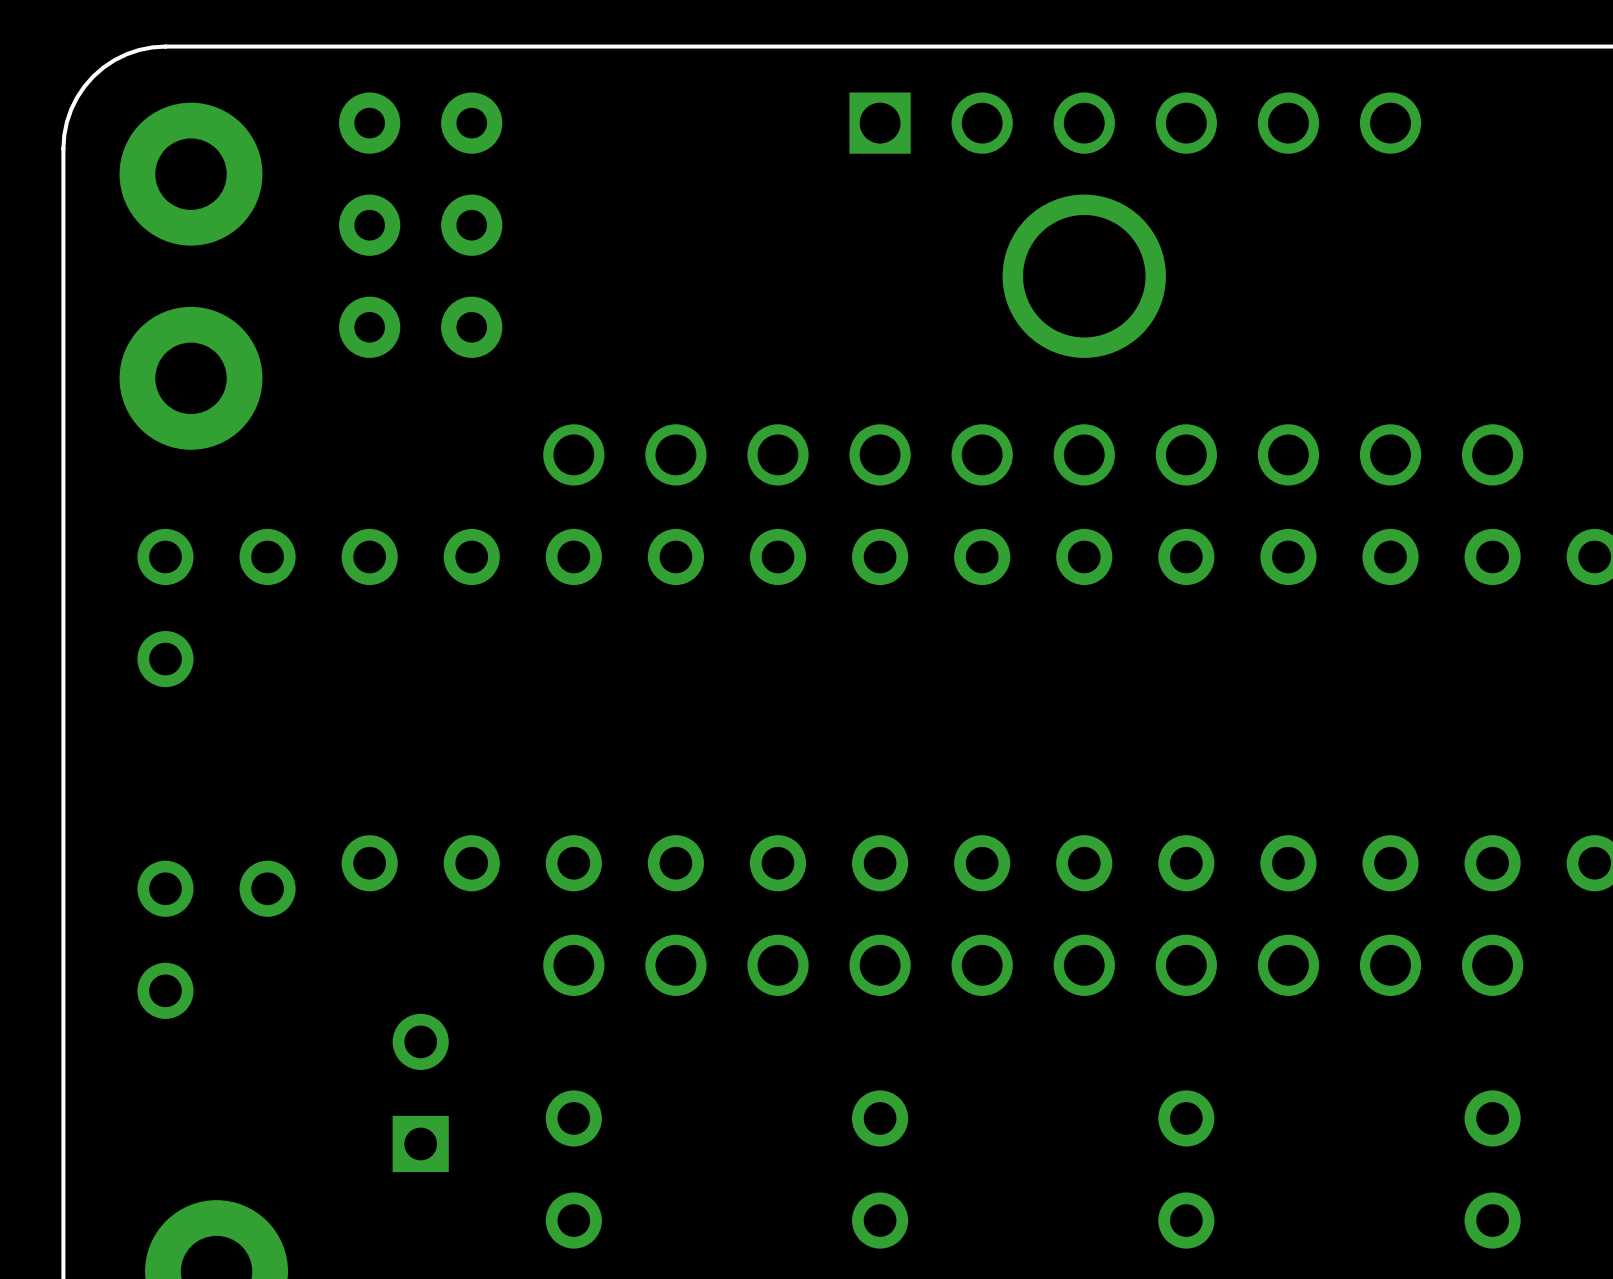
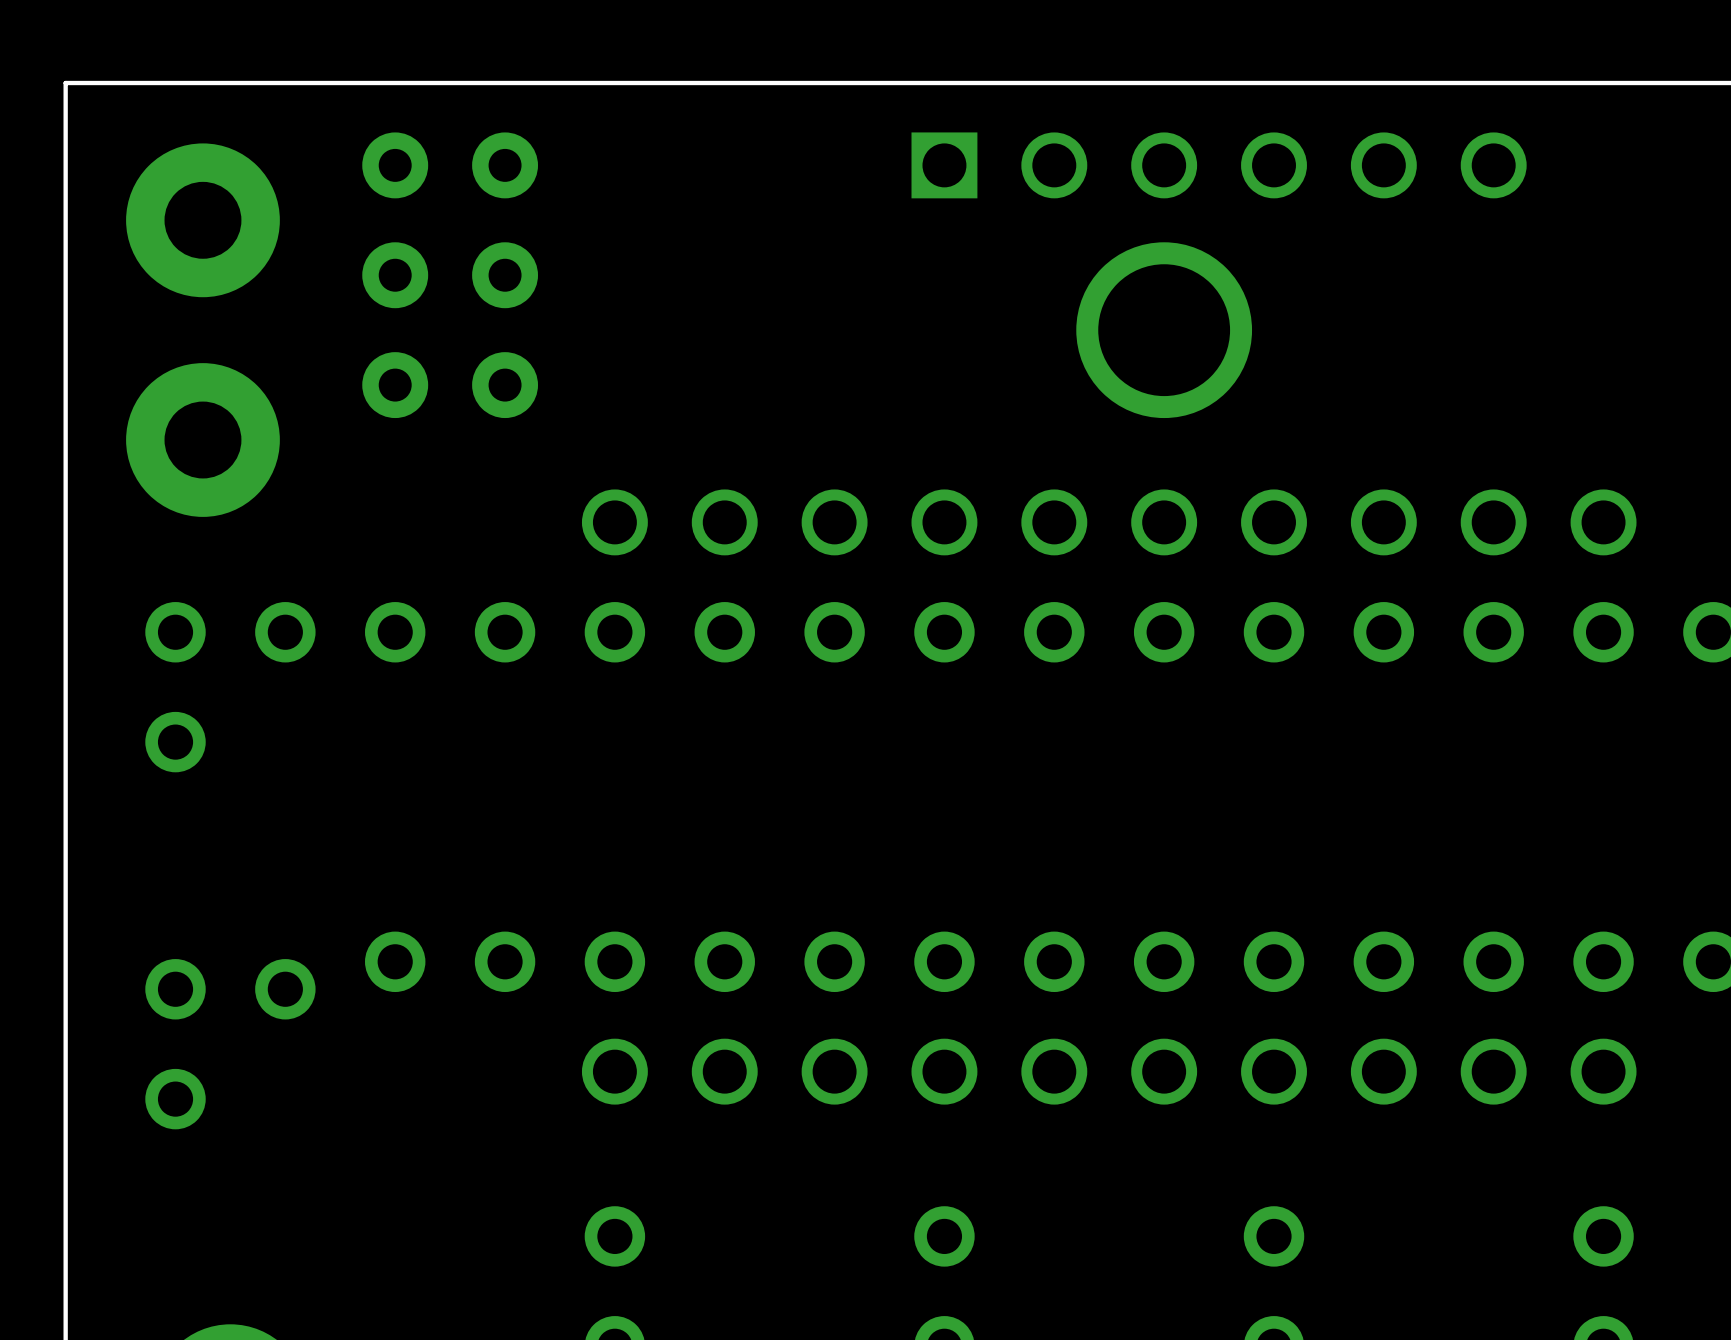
board edge: (165, 46) (152, 47) (126, 54) (103, 67) (93, 76) (84, 86) (71, 109) (66, 122) (63, 148) -> (175, 83) (65, 83) (65, 192)
part: (420, 1092) -> none

